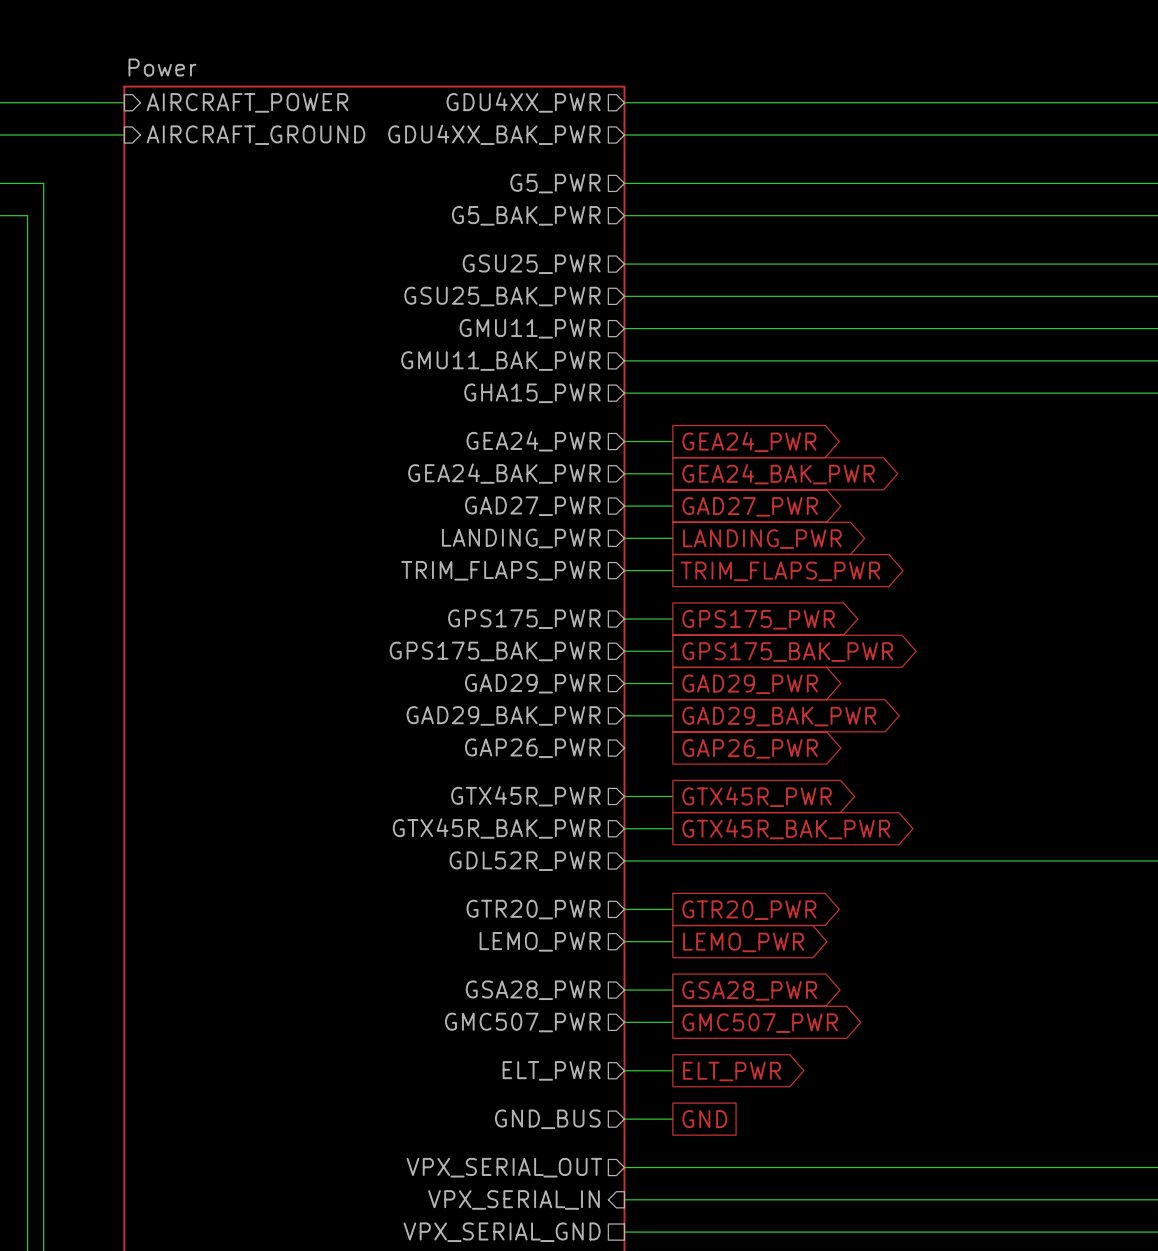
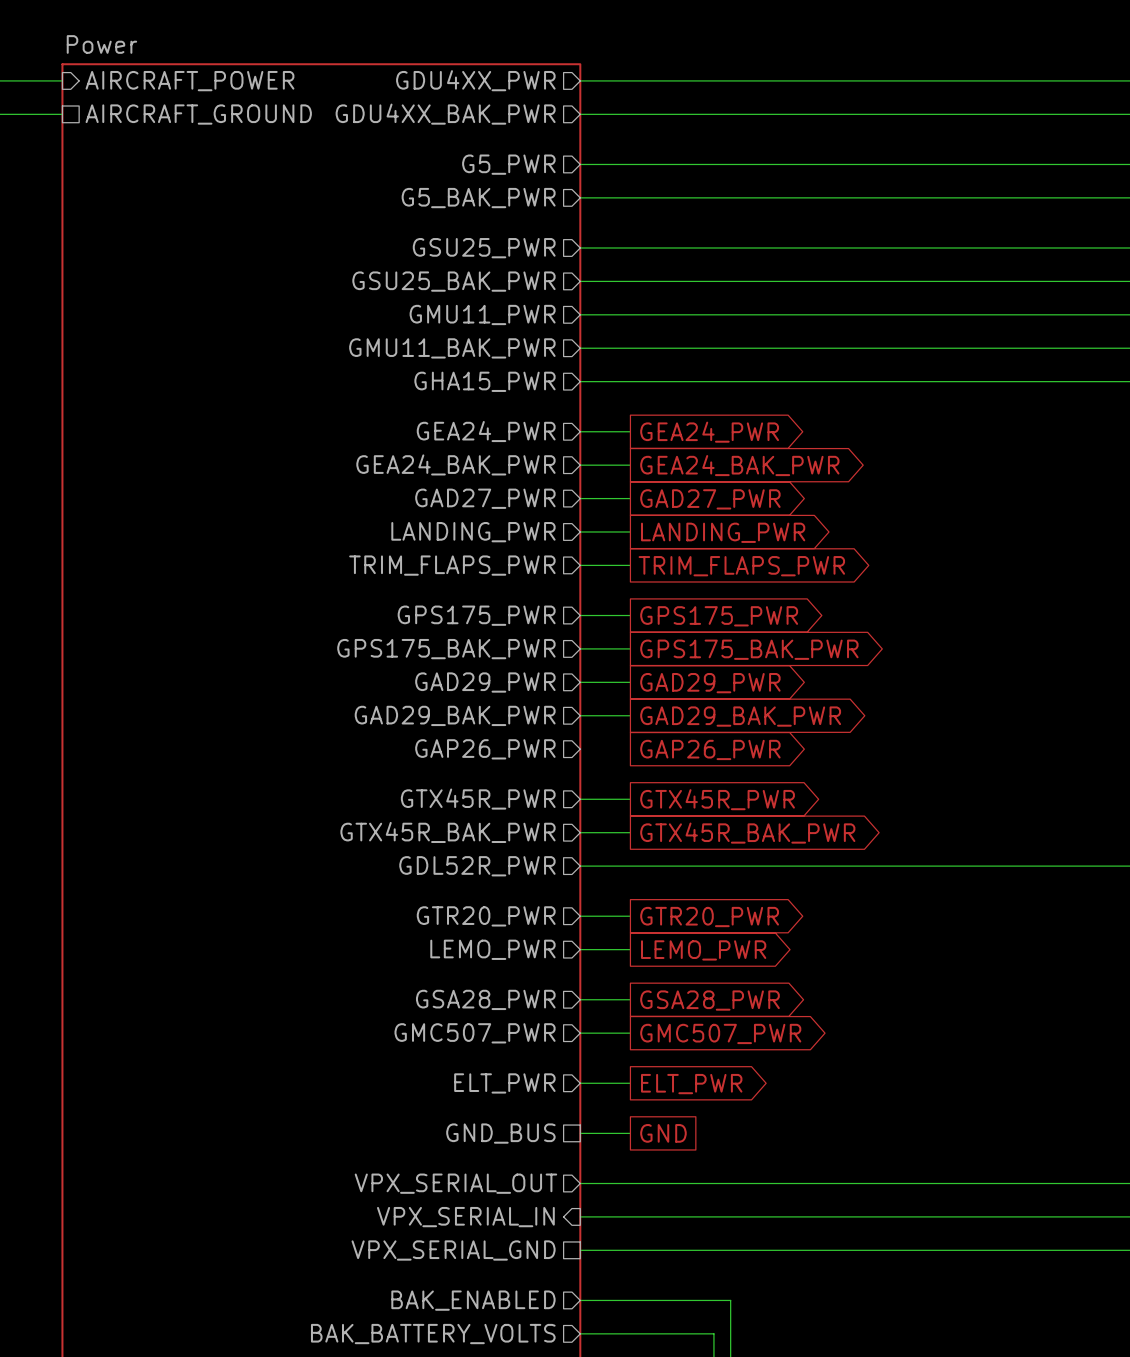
sheet pin shape: input (255, 135) -> passive (198, 114)
sheet pin shape: output (547, 1119) -> passive (500, 1133)

